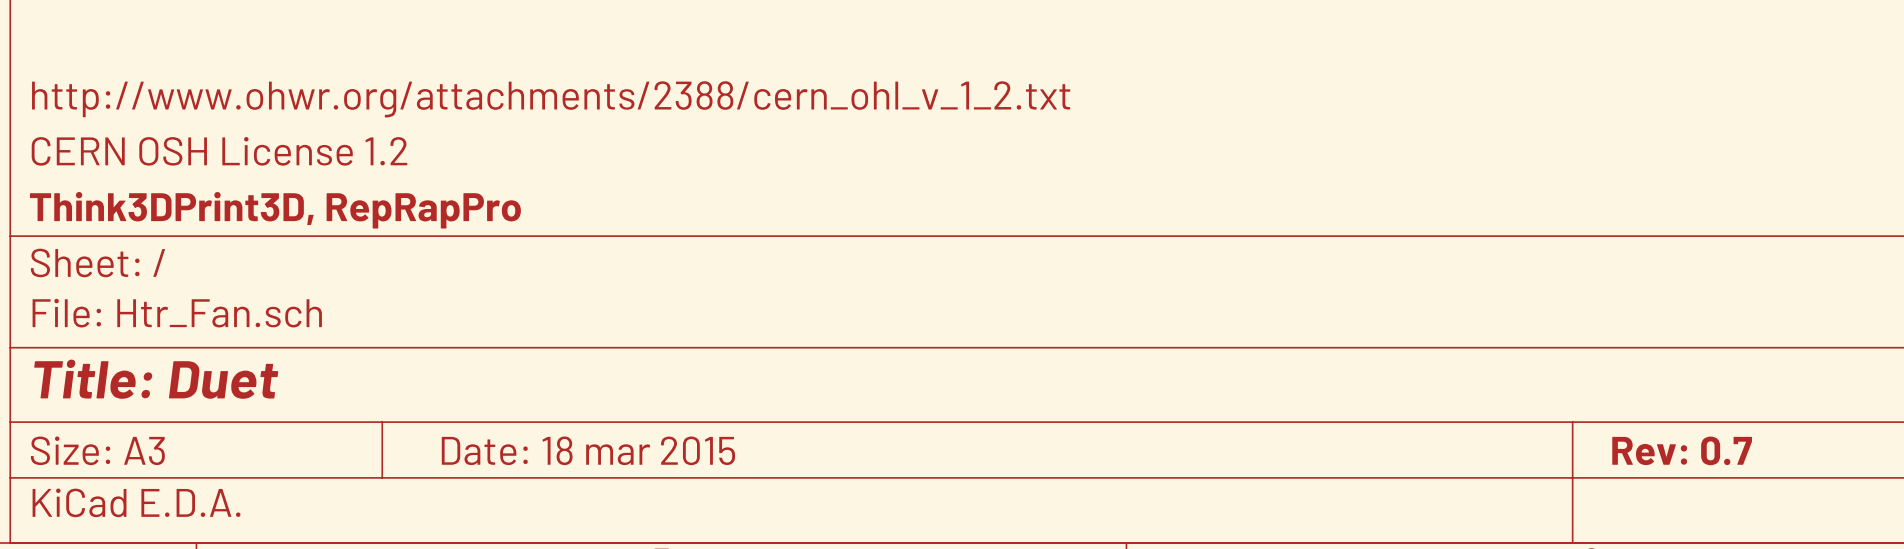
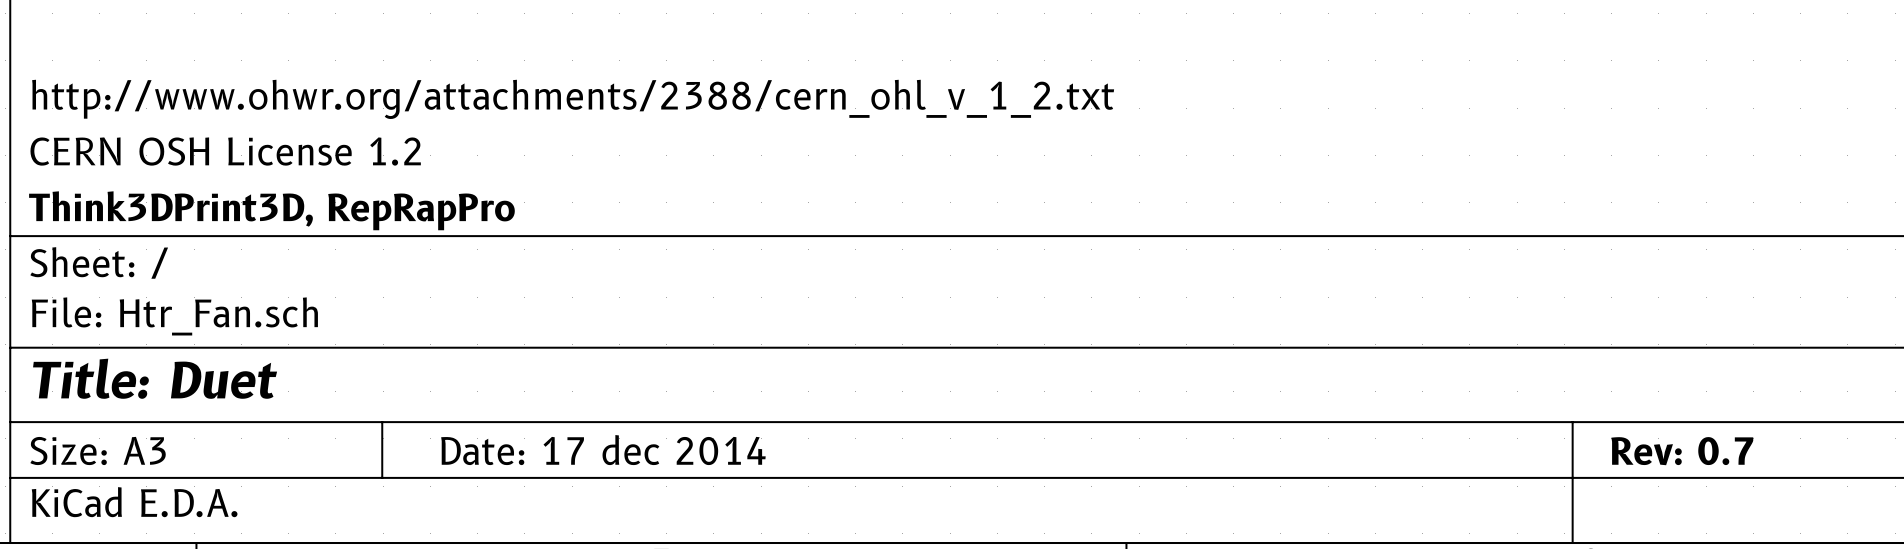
title block: Date: 18 mar 2015 (588, 450) -> Date: 17 dec 2014 (603, 450)

